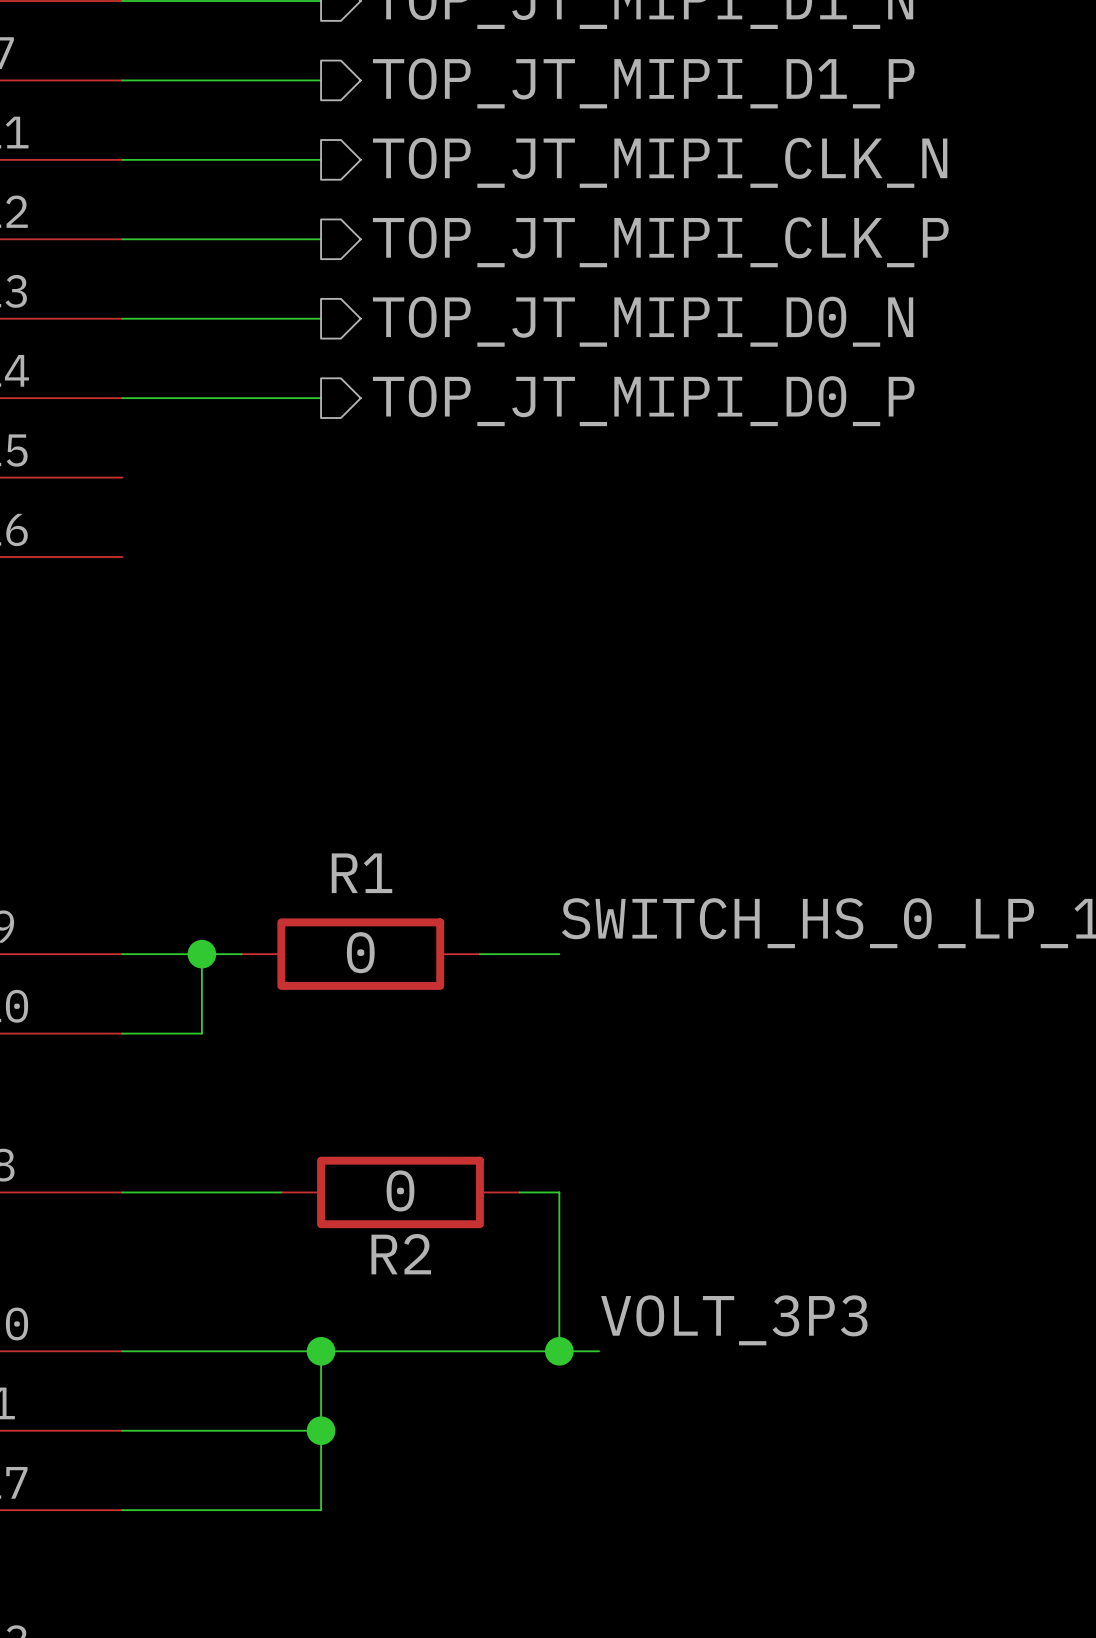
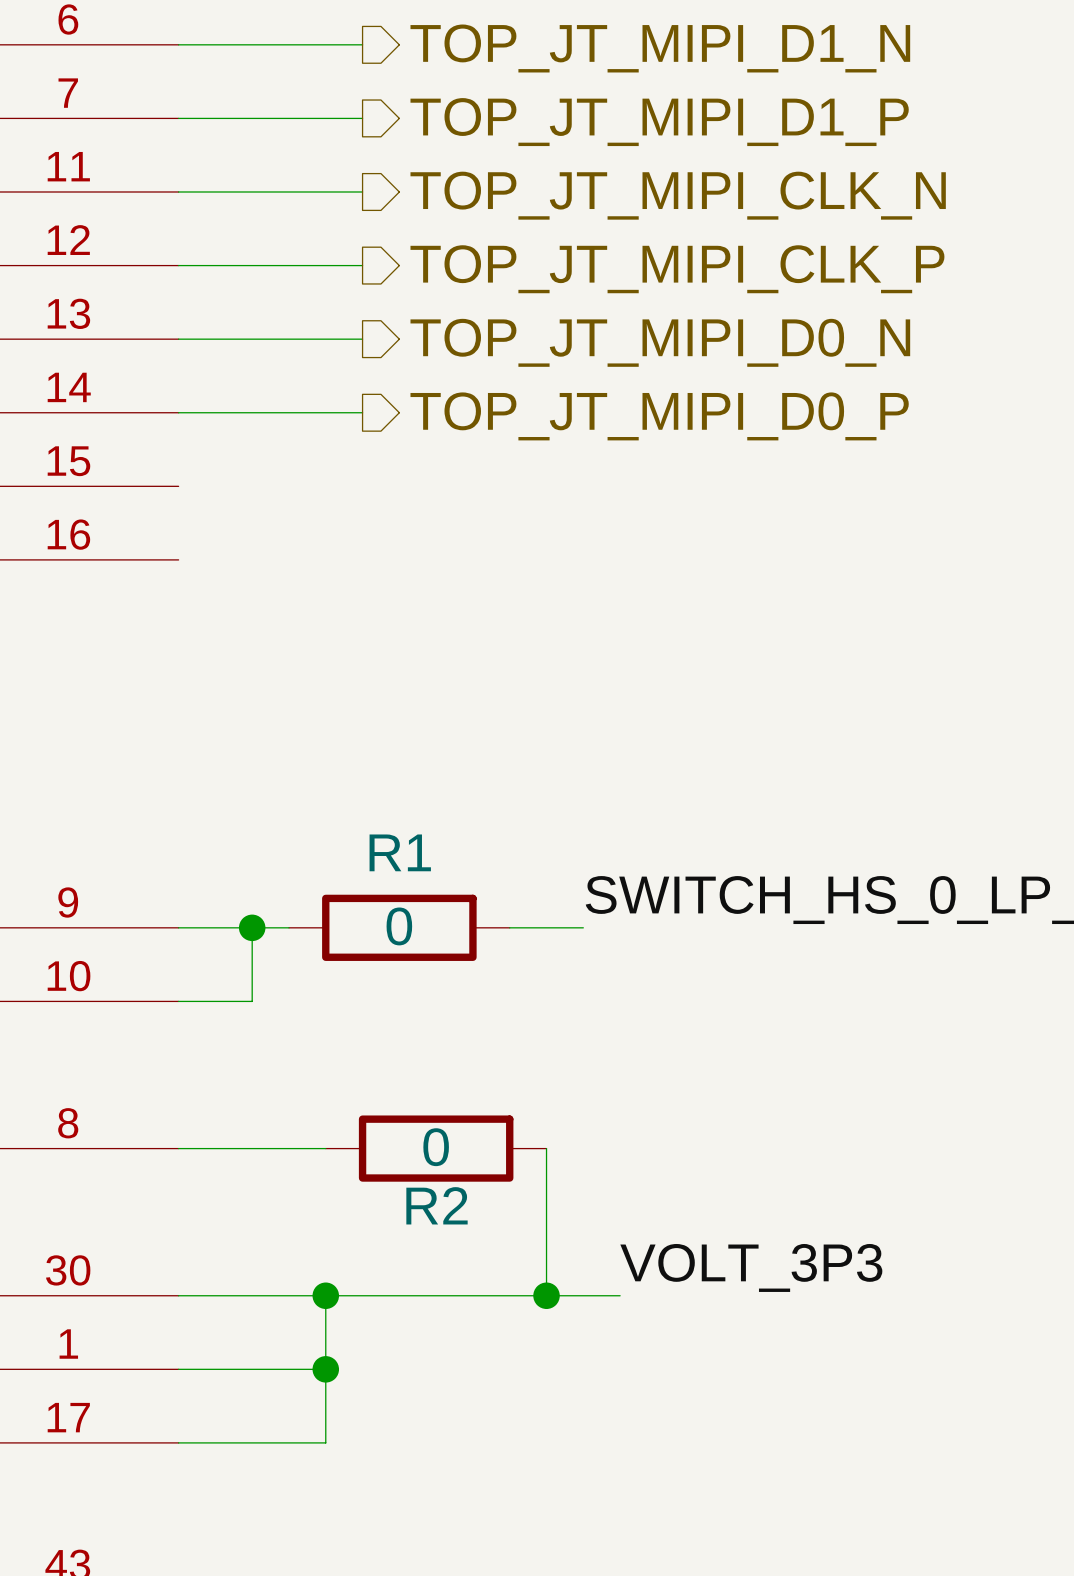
wire: (519, 1192) (559, 1192) (559, 1351) -> (546, 1148) (546, 1295)
wire: (321, 1351) (321, 1510) (281, 1510) -> (325, 1295) (325, 1442)
junction position: (321, 1351) -> (325, 1295)
junction position: (559, 1351) -> (546, 1295)
wire: (281, 1430) (321, 1430) -> none
junction position: (321, 1430) -> (325, 1369)

